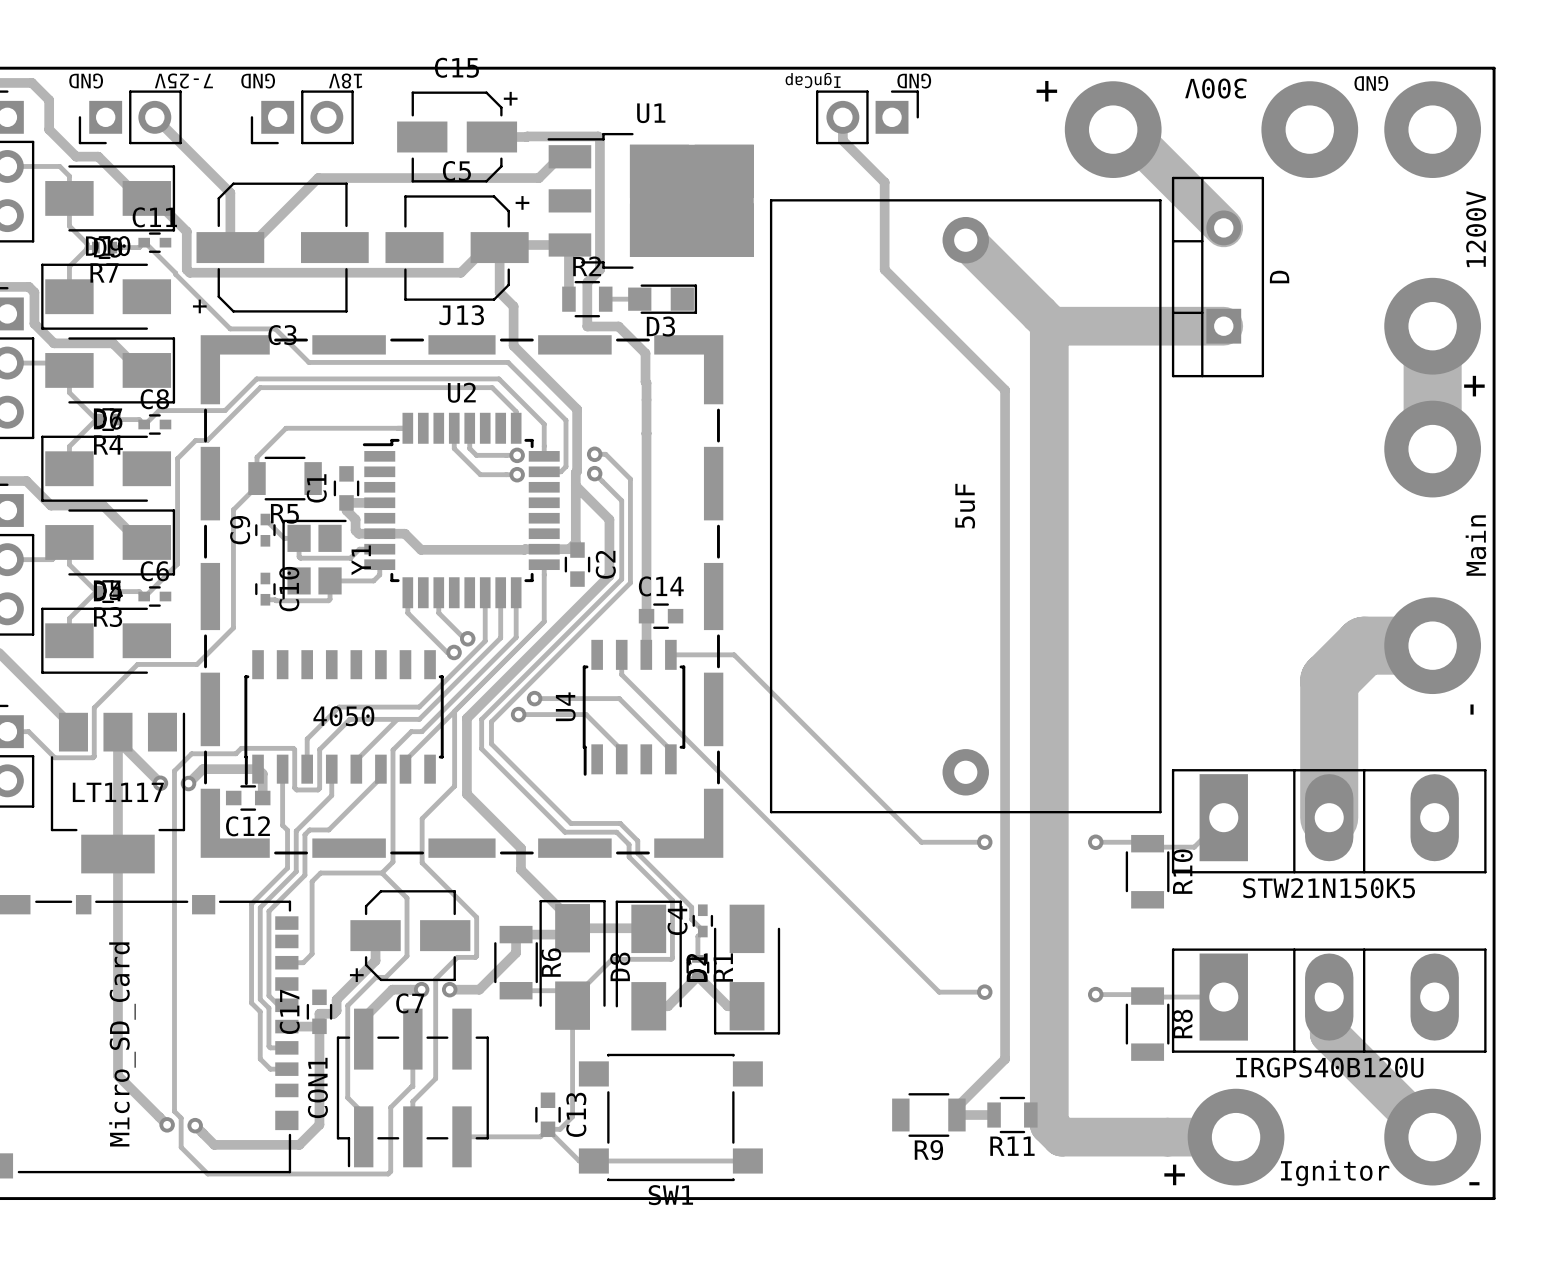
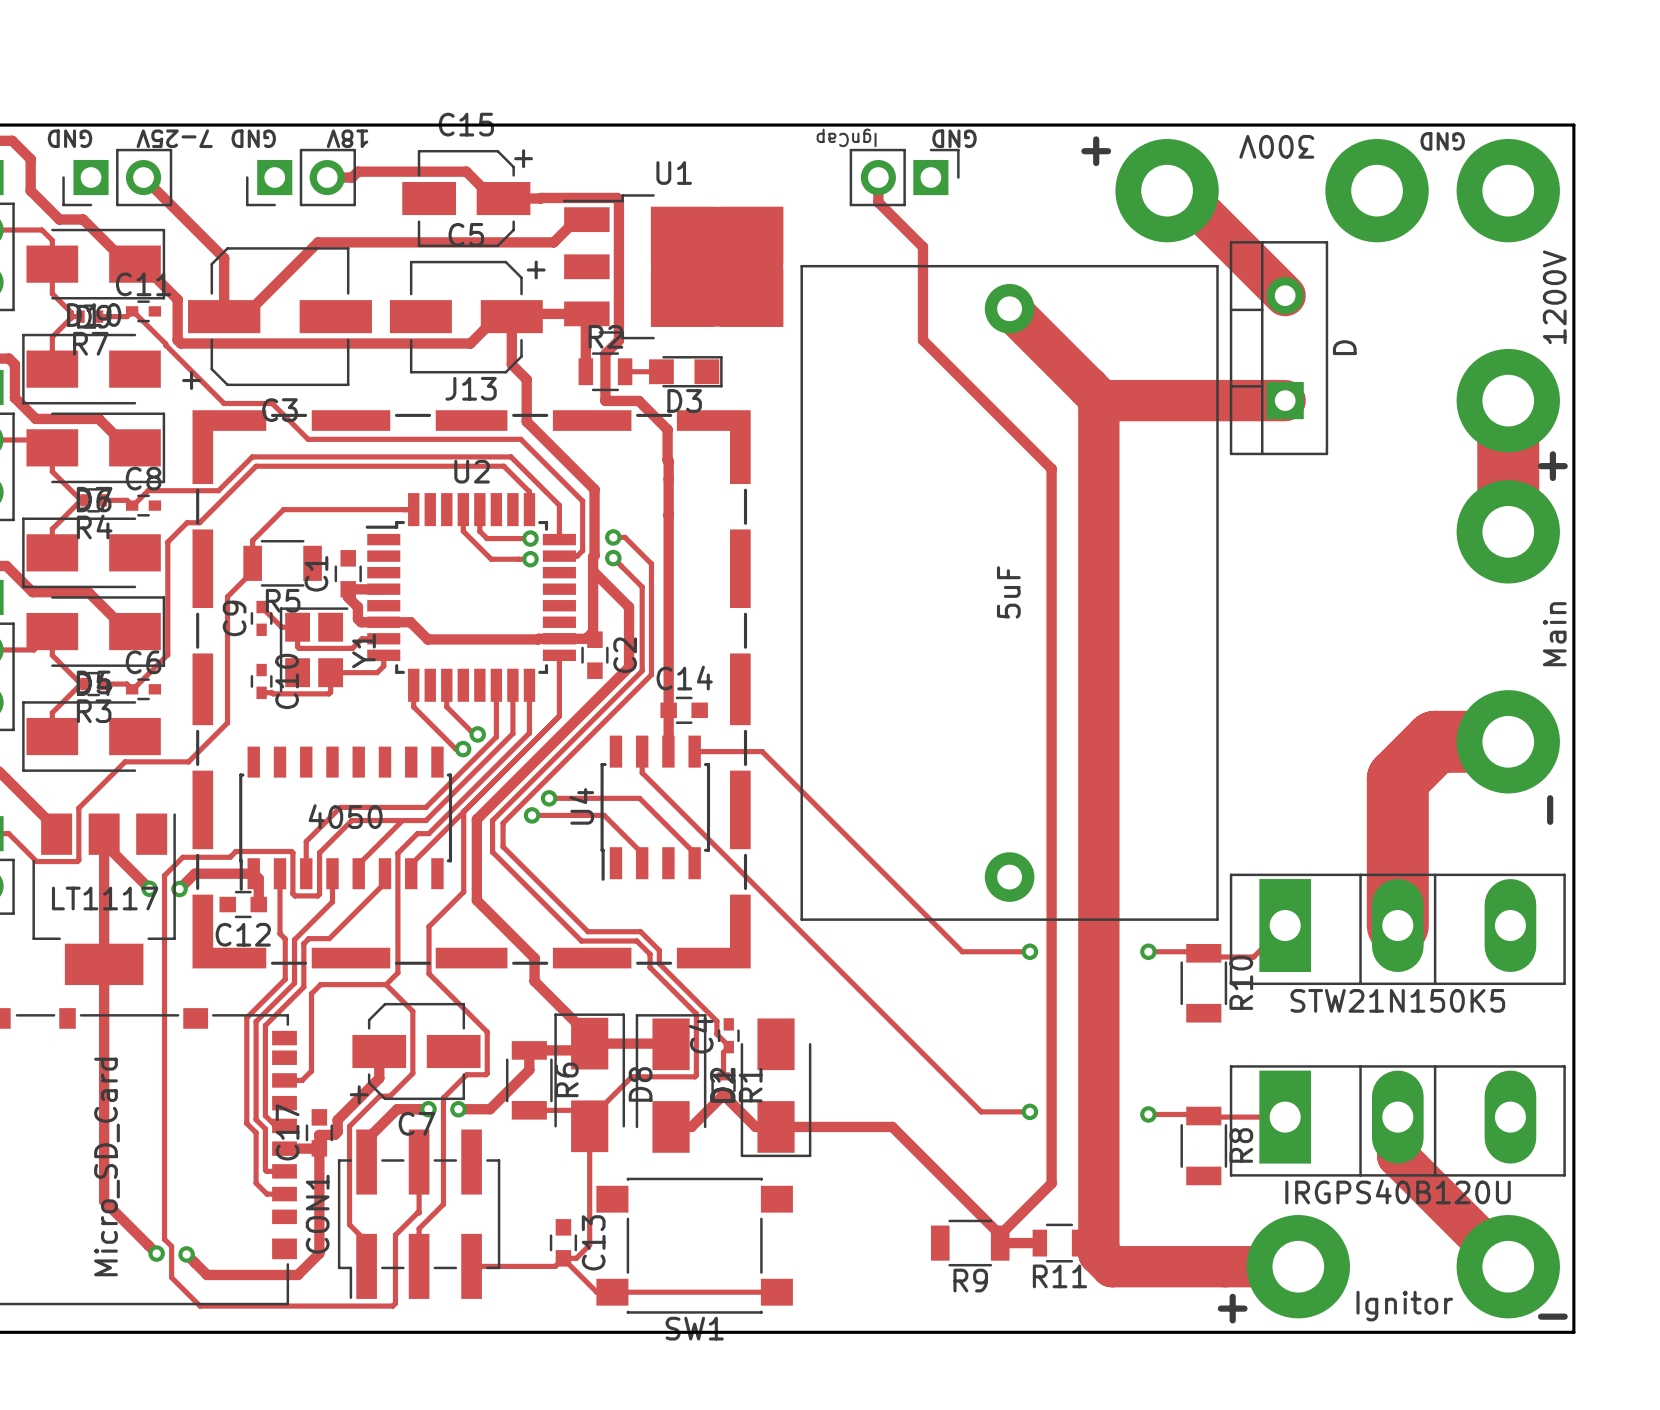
track: none -> (327, 177) (352, 177) (357, 171) (466, 171) (493, 198) (503, 198)
track: none -> (776, 1126) (892, 1126) (1000, 1234)

